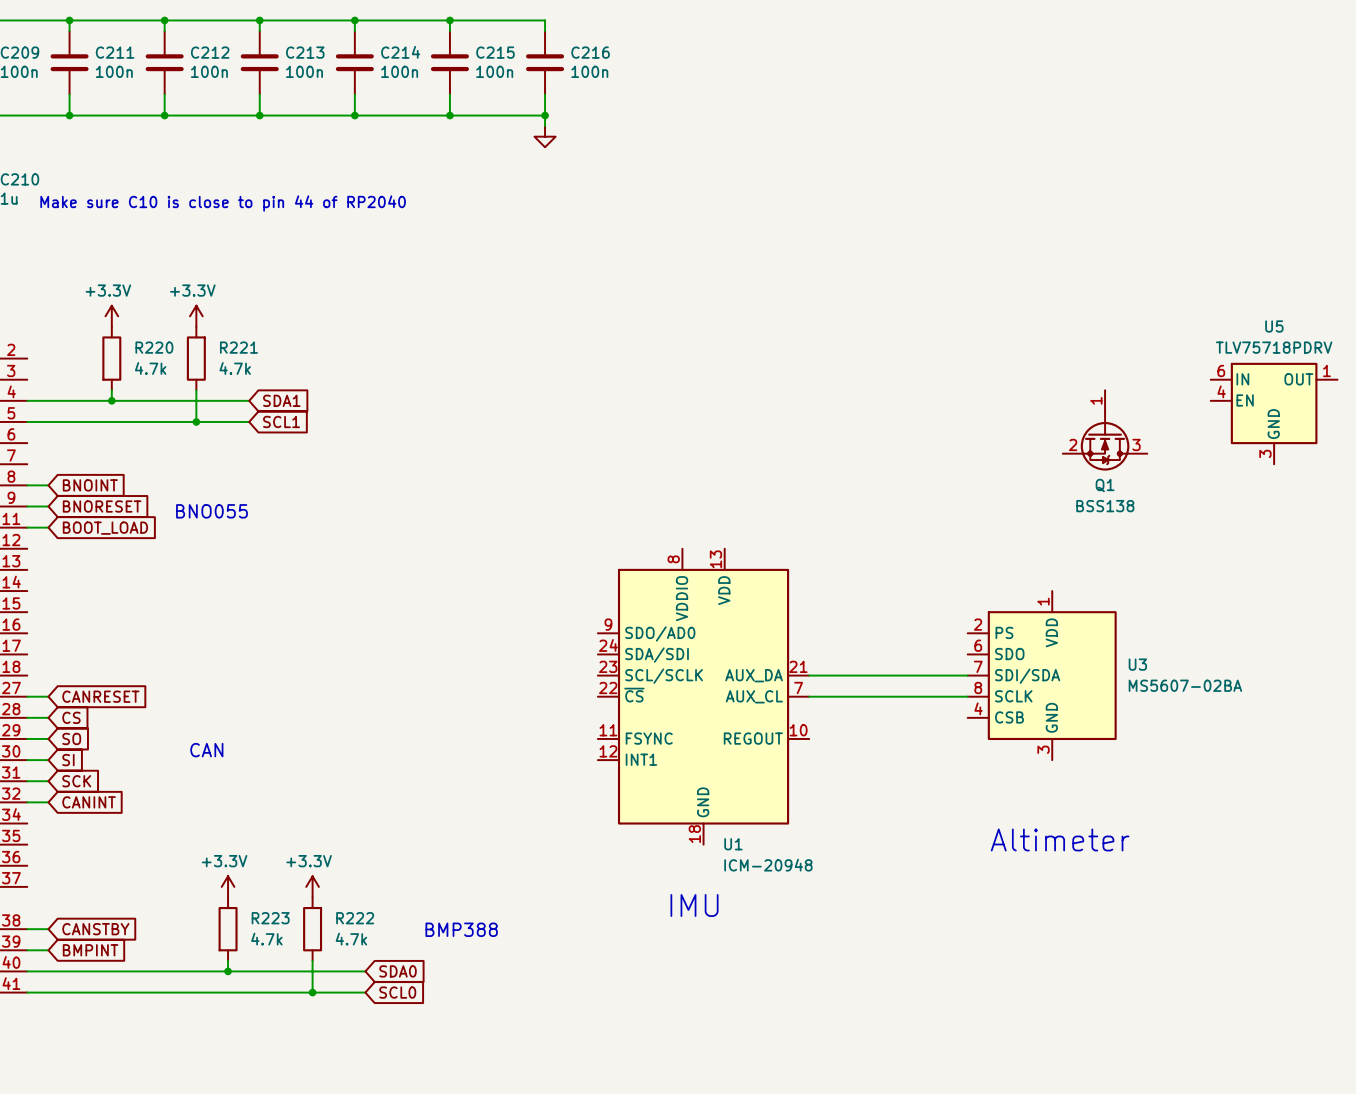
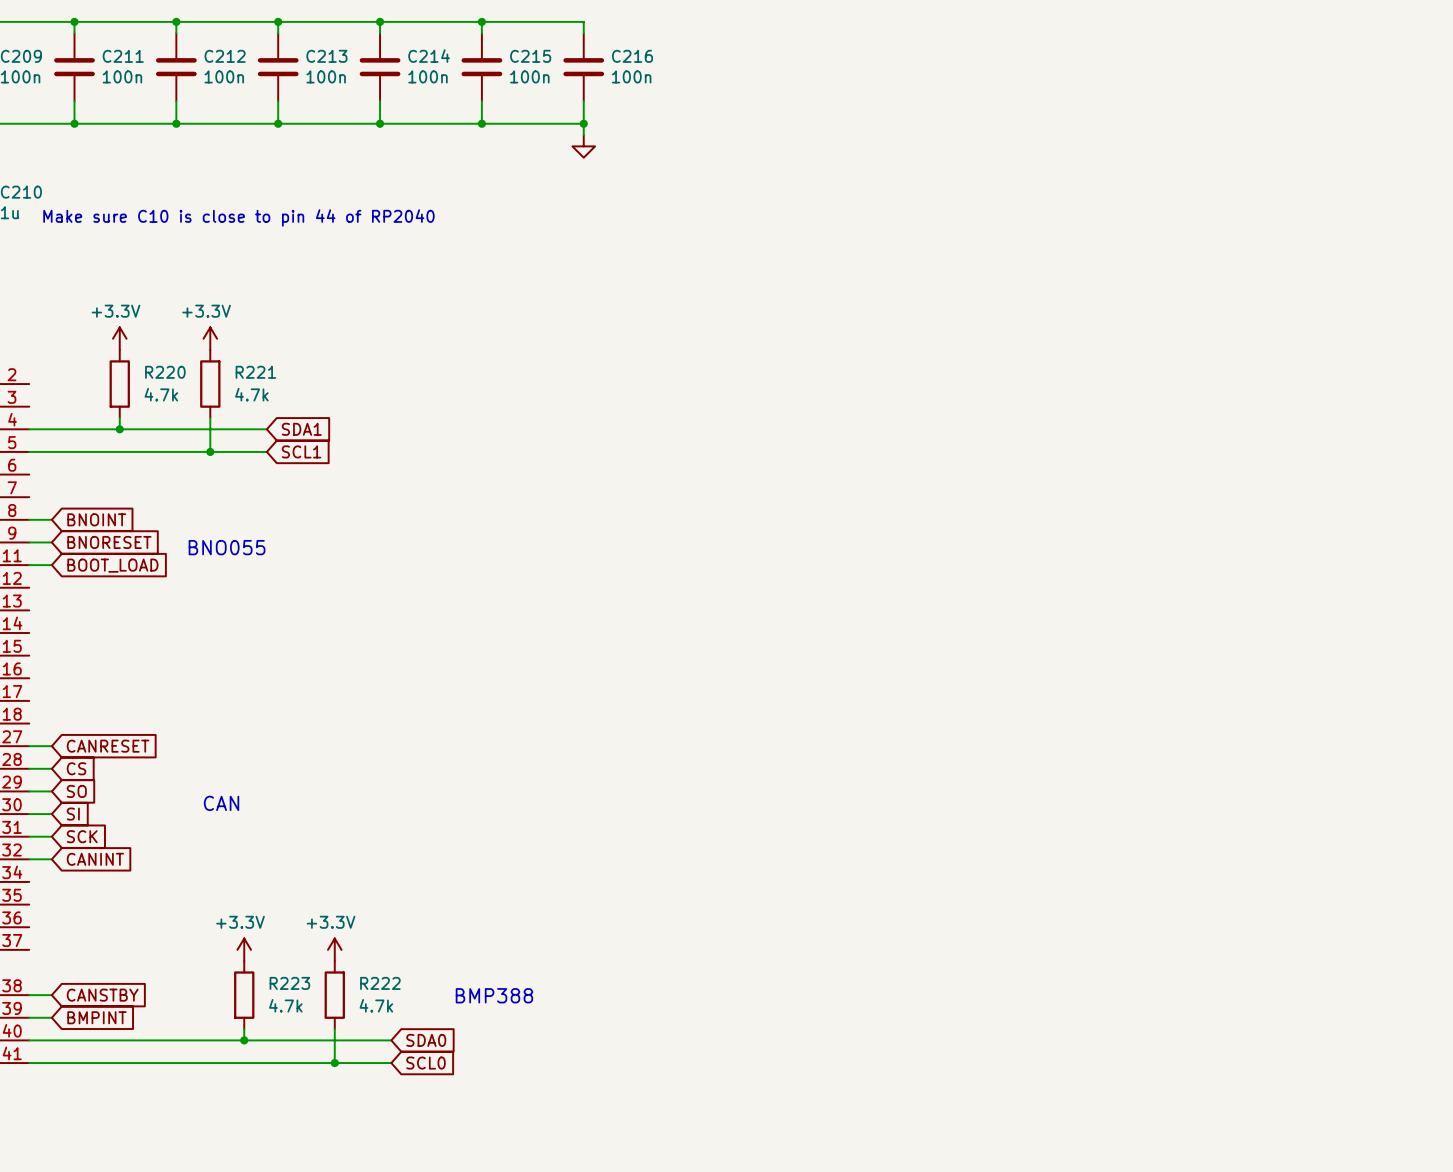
U5: TLV75718PDRV (1274, 413) -> none
Q1: BSS138 (1105, 430) -> none
wire: (809, 675) (967, 675) -> none
U3: MS5607-02BA (1042, 675) -> none
U1: ICM-20948 (703, 696) -> none
wire: (809, 696) (967, 696) -> none
text: Altimeter (1060, 839) -> none
text: IMU (694, 905) -> none

